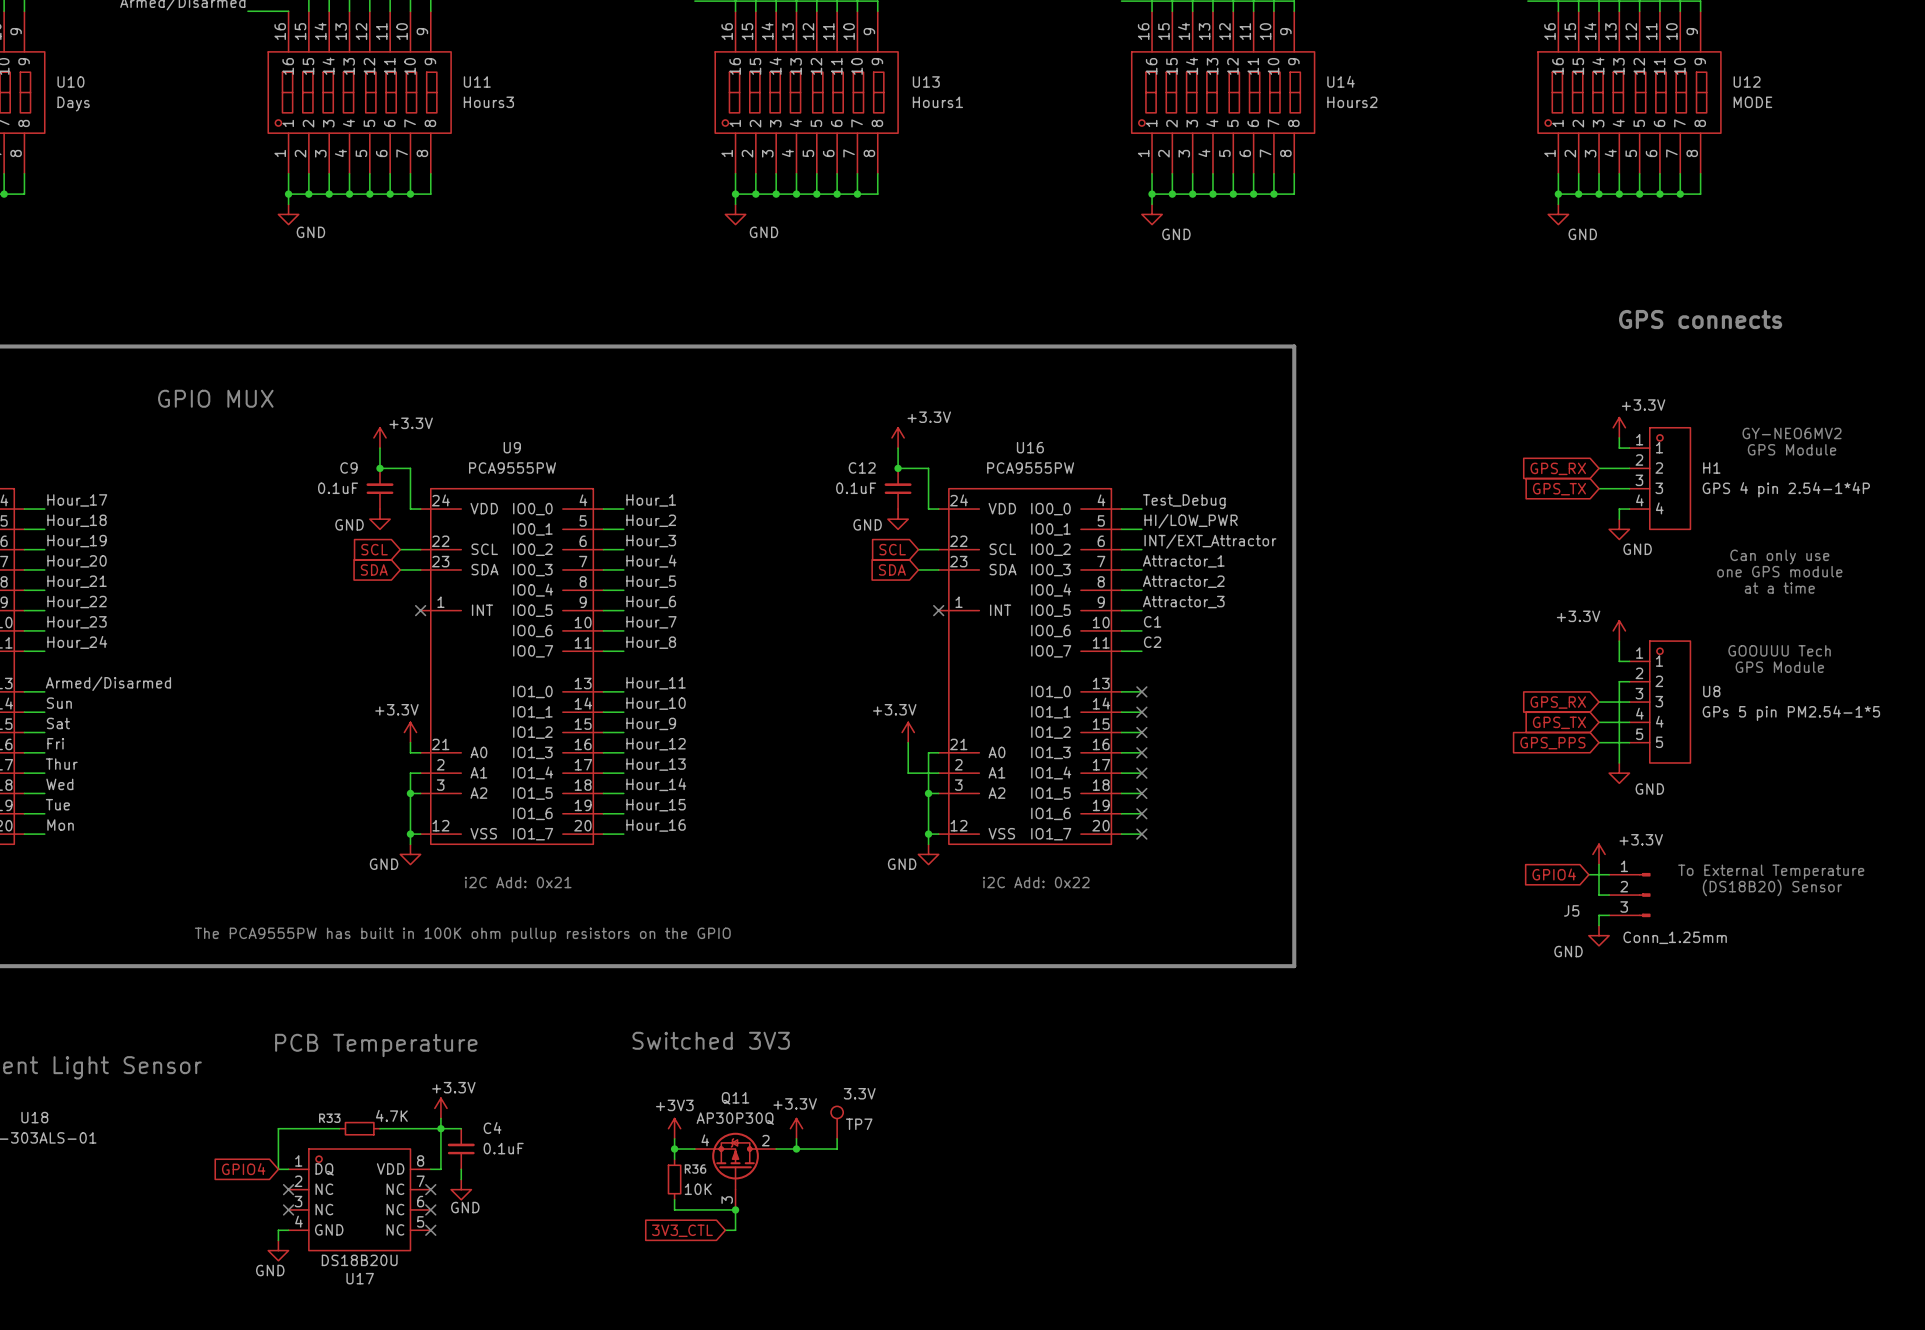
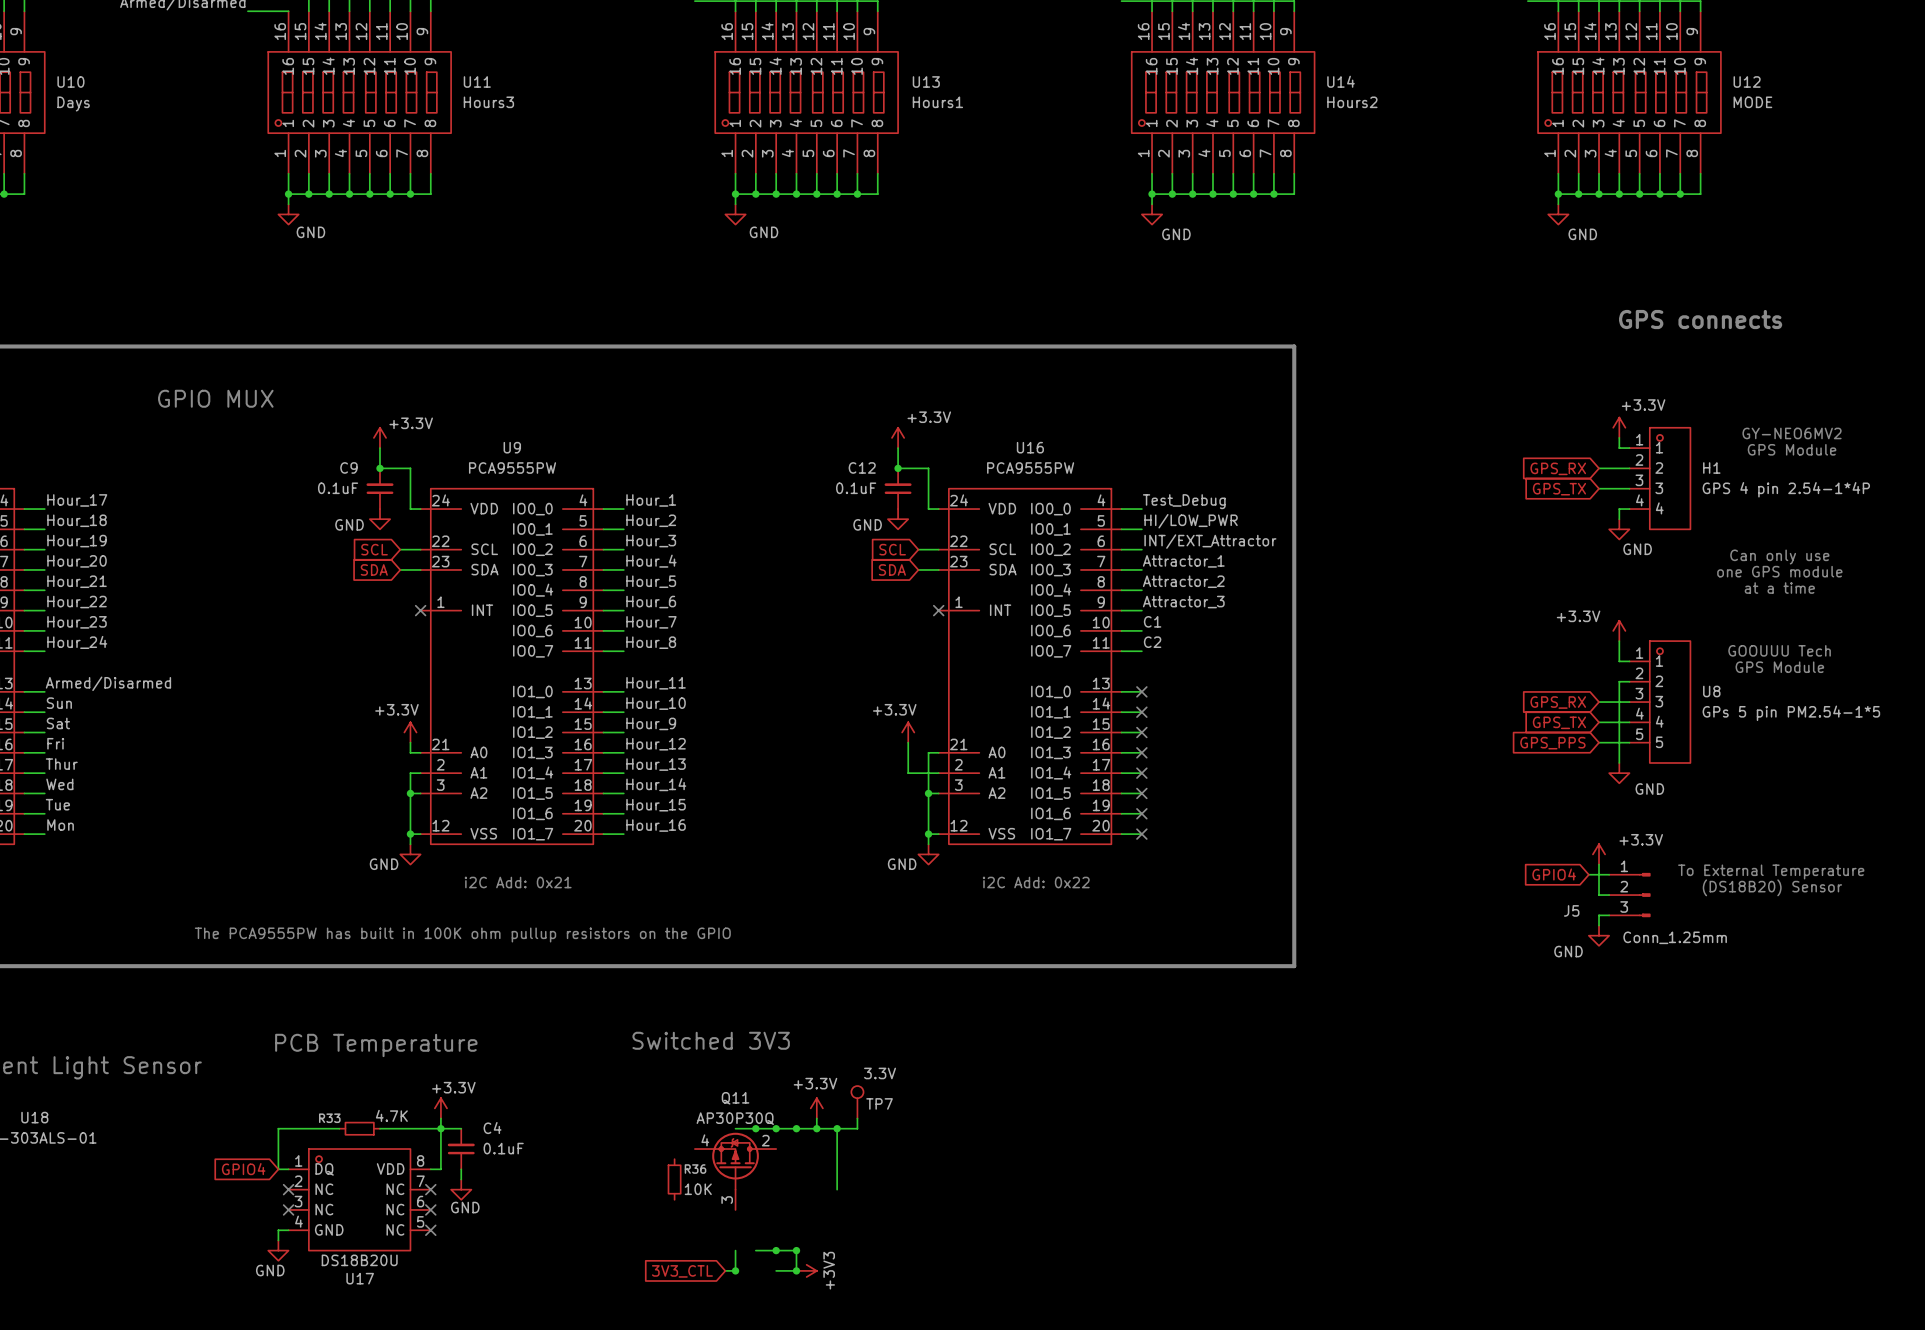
wire: none -> (857, 1118) (857, 1128) (735, 1128)
TP7 position: (837, 1122) -> (857, 1102)
power symbol rotation: 0° (674, 1128) -> 90° clockwise (806, 1270)
power symbol position: +3V3 (674, 1128) -> +3V3 (806, 1270)
junction: none -> (755, 1128)
junction: none -> (776, 1128)
junction: none -> (796, 1128)
power symbol position: +3.3V (796, 1128) -> +3.3V (816, 1108)
junction: none -> (816, 1128)
junction: none -> (837, 1128)
wire: (674, 1138) (674, 1159) -> none
wire: (796, 1138) (796, 1149) -> (816, 1118) (816, 1128)
wire: (674, 1149) (694, 1149) -> none
junction: (674, 1149) -> none
wire: (776, 1149) (837, 1149) -> (837, 1189) (837, 1149)
junction: (796, 1149) -> none
wire: (674, 1199) (674, 1209) (735, 1209) (735, 1230) (725, 1230) -> none
junction: (735, 1209) -> none
global label position: 3V3_CTL (682, 1230) -> 3V3_CTL (682, 1271)
wire: none -> (735, 1250) (735, 1270) (725, 1270)
wire: none -> (755, 1250) (796, 1250) (796, 1270) (776, 1270)
junction: none -> (776, 1250)
junction: none -> (796, 1250)
junction: none -> (735, 1270)
junction: none -> (796, 1270)

